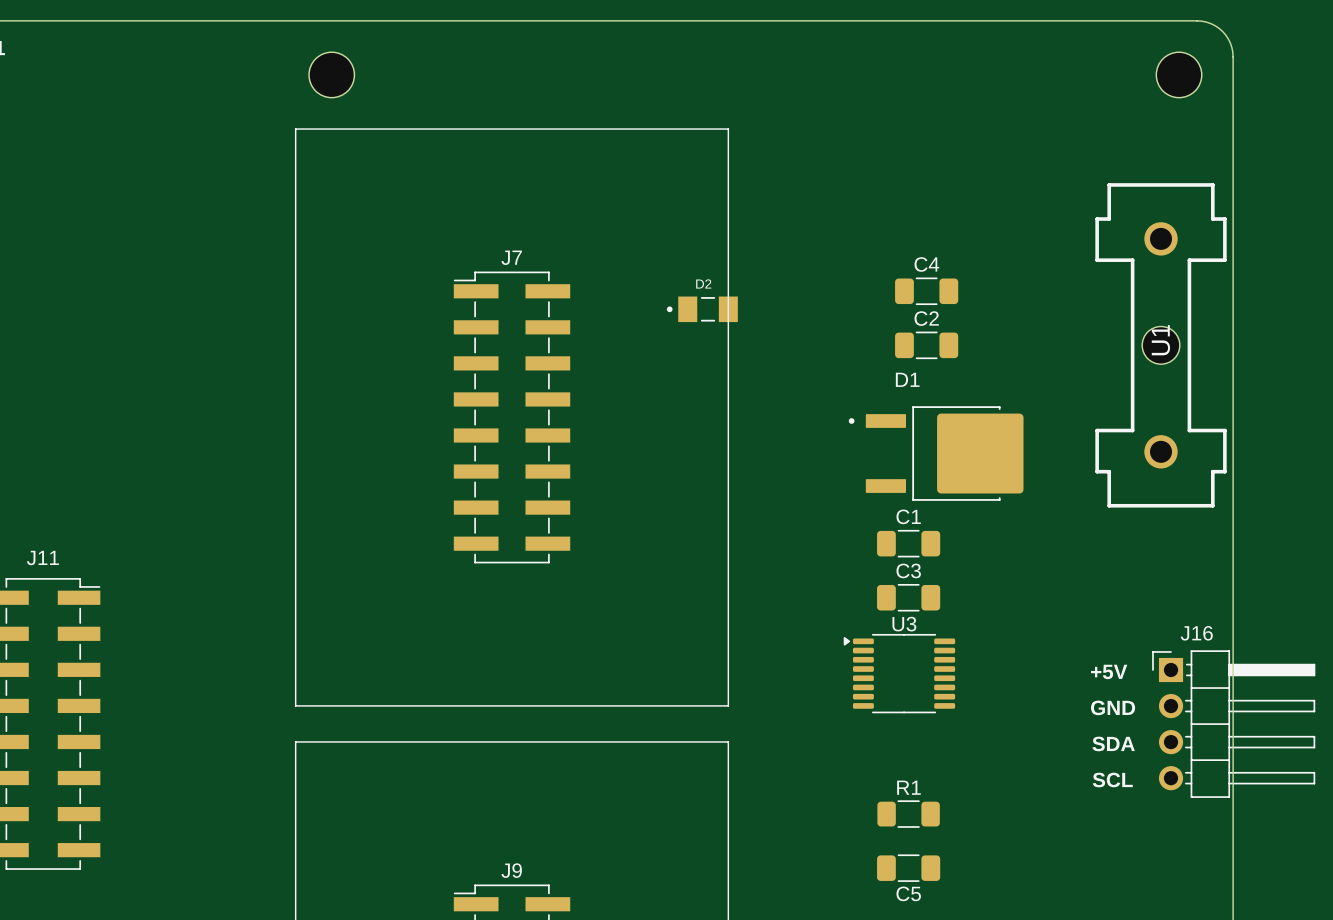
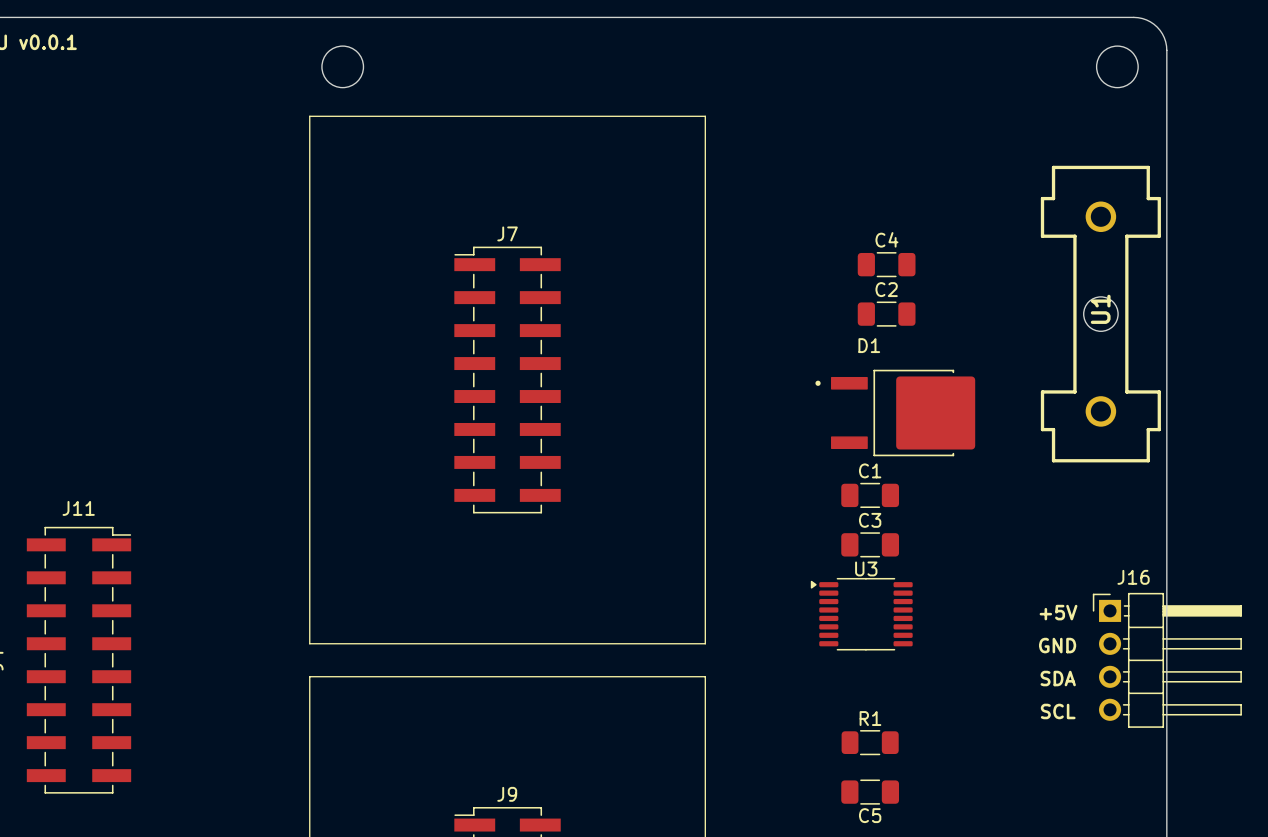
D2: (702, 309) -> none

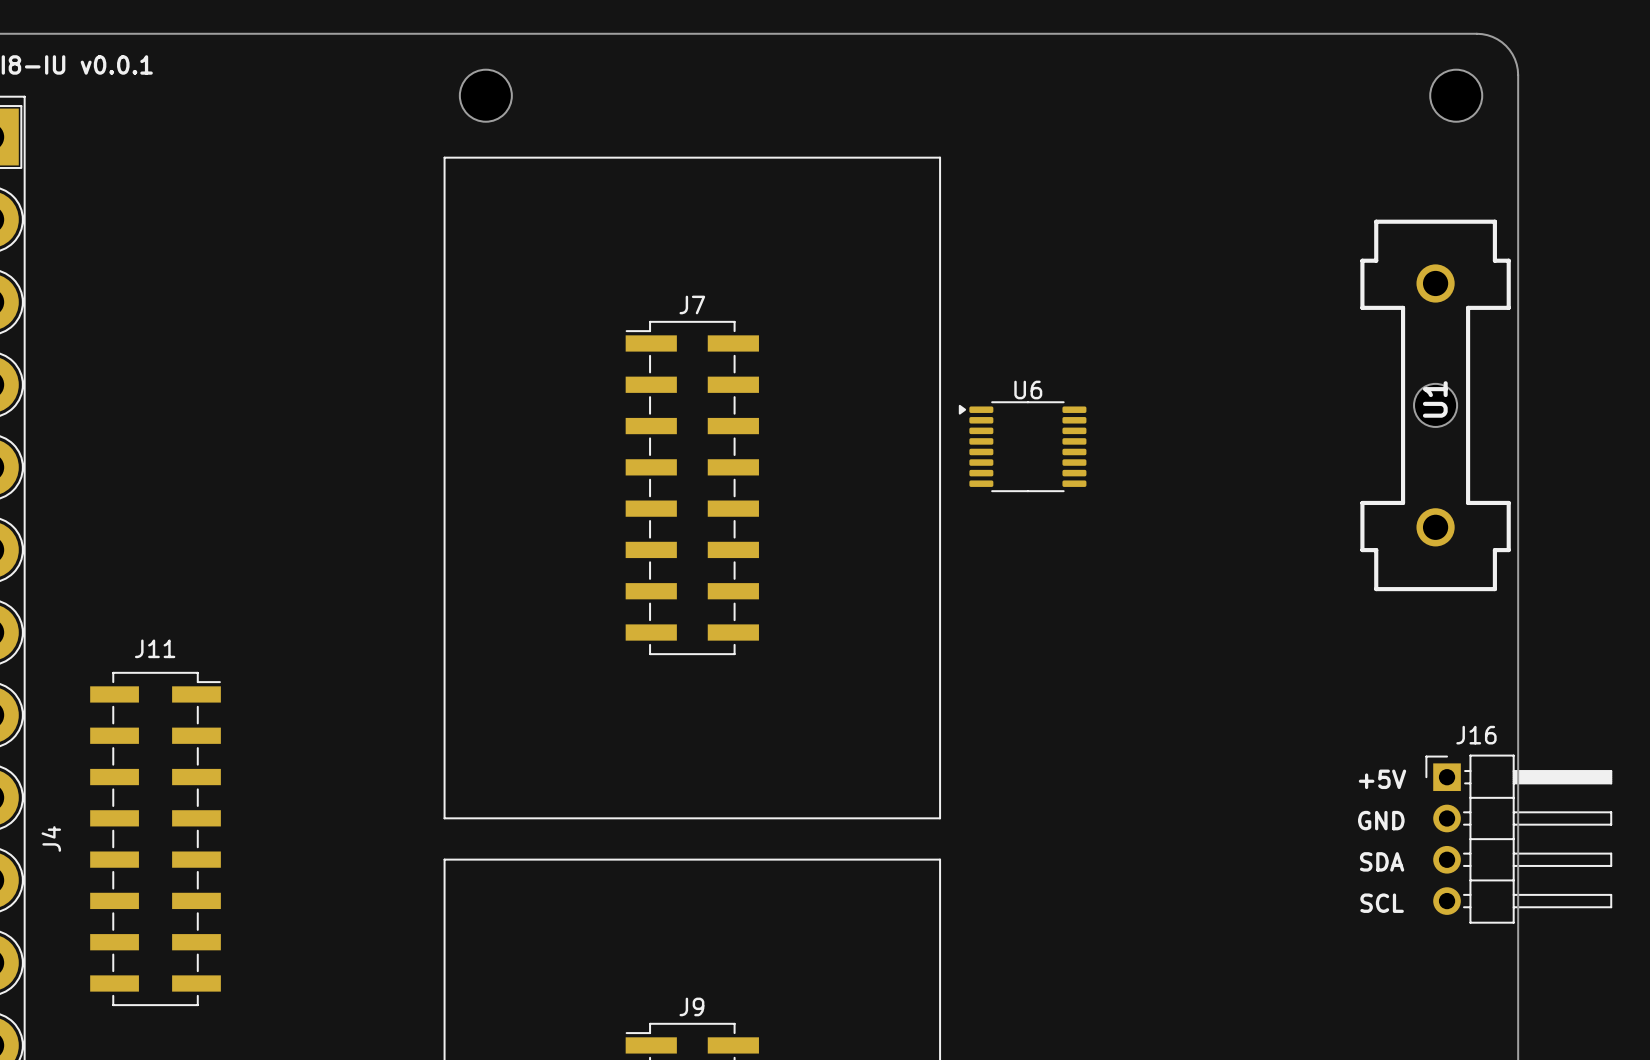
C4: (886, 264) -> none
C2: (886, 314) -> none
U6: none -> (1022, 446)
D1: (895, 412) -> none
C1: (870, 495) -> none
C3: (870, 544) -> none
U3: (861, 614) -> none
R1: (870, 742) -> none
C5: (870, 792) -> none

